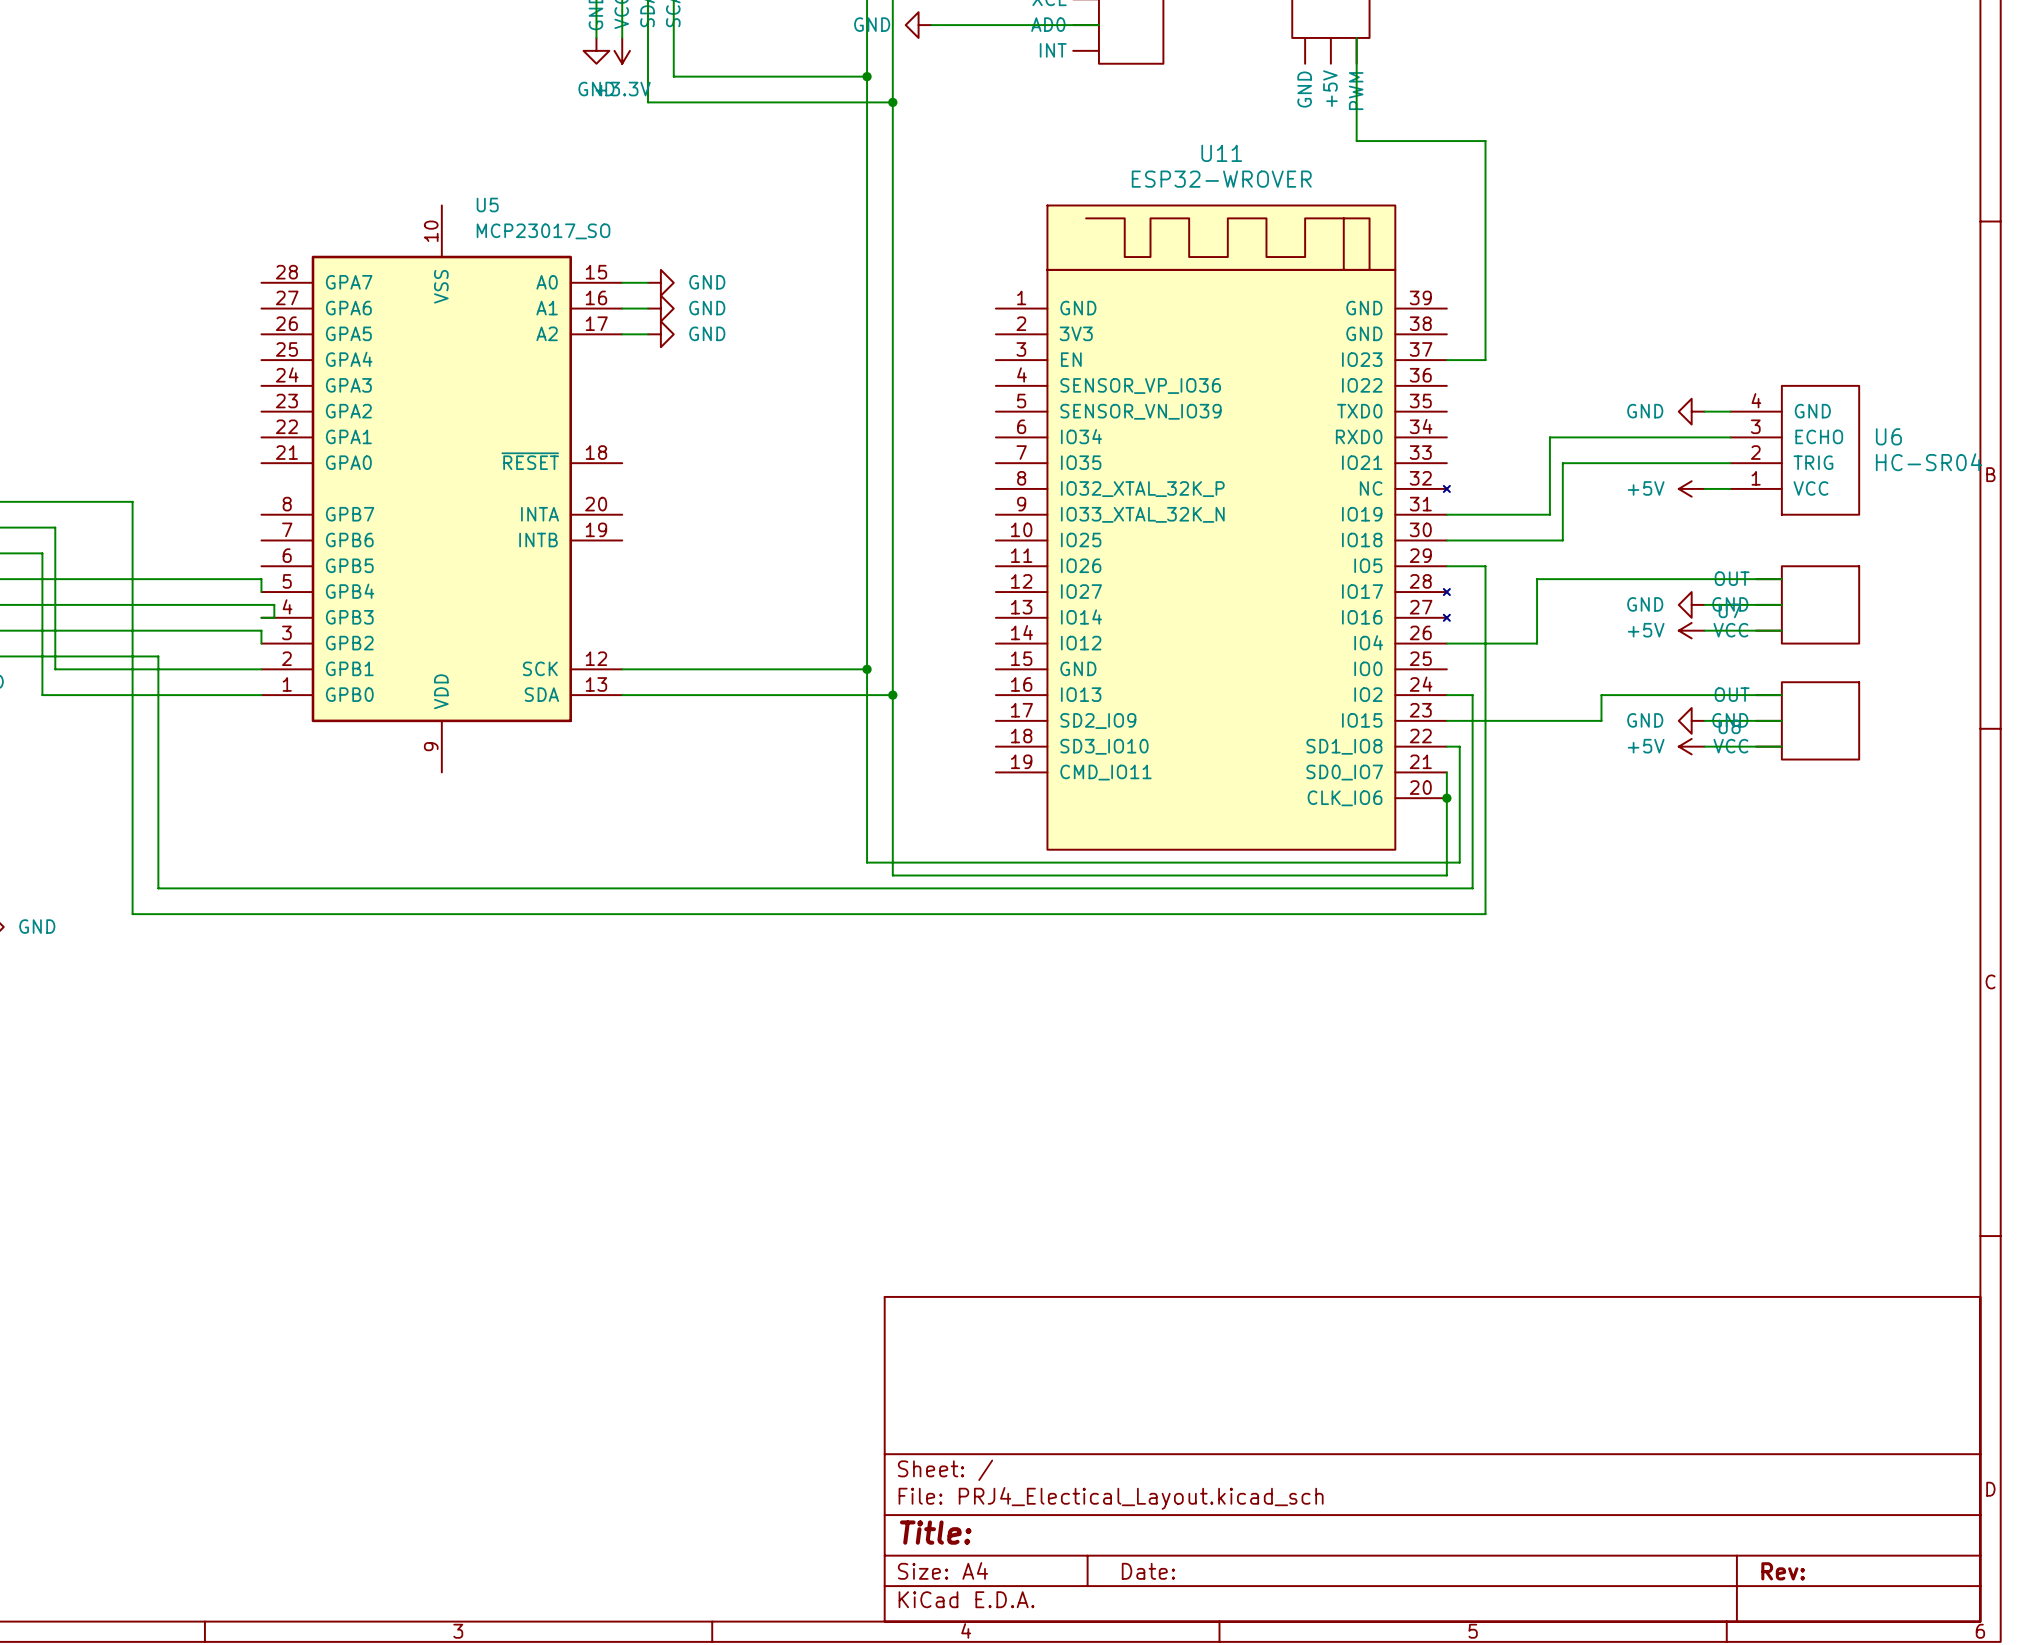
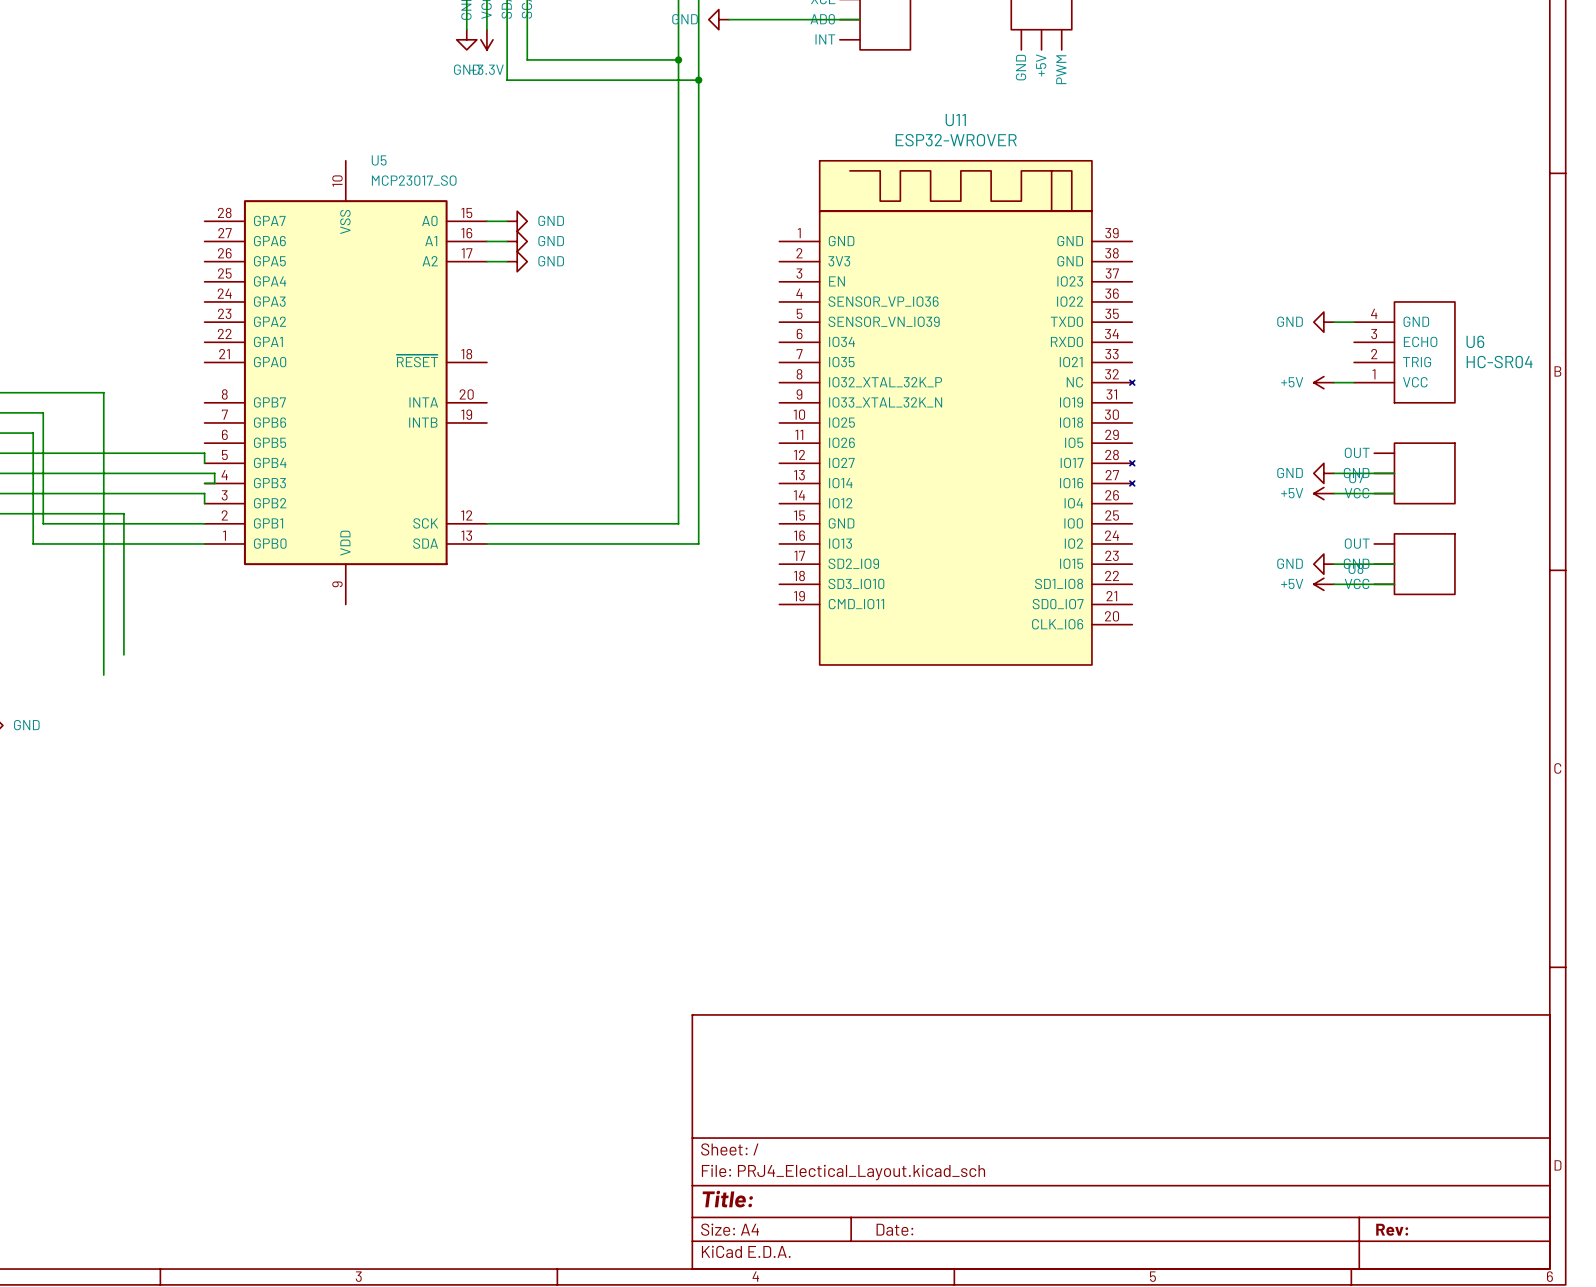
wire: (1356, 37) (1356, 141) (1485, 141) (1485, 360) (1446, 360) -> none
wire: (1730, 437) (1549, 437) (1549, 514) (1446, 514) -> none
wire: (1730, 463) (1562, 463) (1562, 540) (1446, 540) -> none
wire: (1446, 566) (1485, 566) (1485, 914) (132, 914) (132, 862) -> none
wire: (1781, 579) (1537, 579) (1537, 643) (1446, 643) -> none
wire: (867, 669) (867, 862) (1459, 862) (1459, 746) (1446, 746) -> none
junction: (867, 669) -> none
wire: (892, 695) (892, 875) (1446, 875) (1446, 772) -> none
junction: (892, 695) -> none
wire: (1446, 695) (1472, 695) (1472, 888) (158, 888) (158, 836) -> none
wire: (1781, 695) (1601, 695) (1601, 720) (1446, 720) -> none
junction: (1446, 798) -> none

